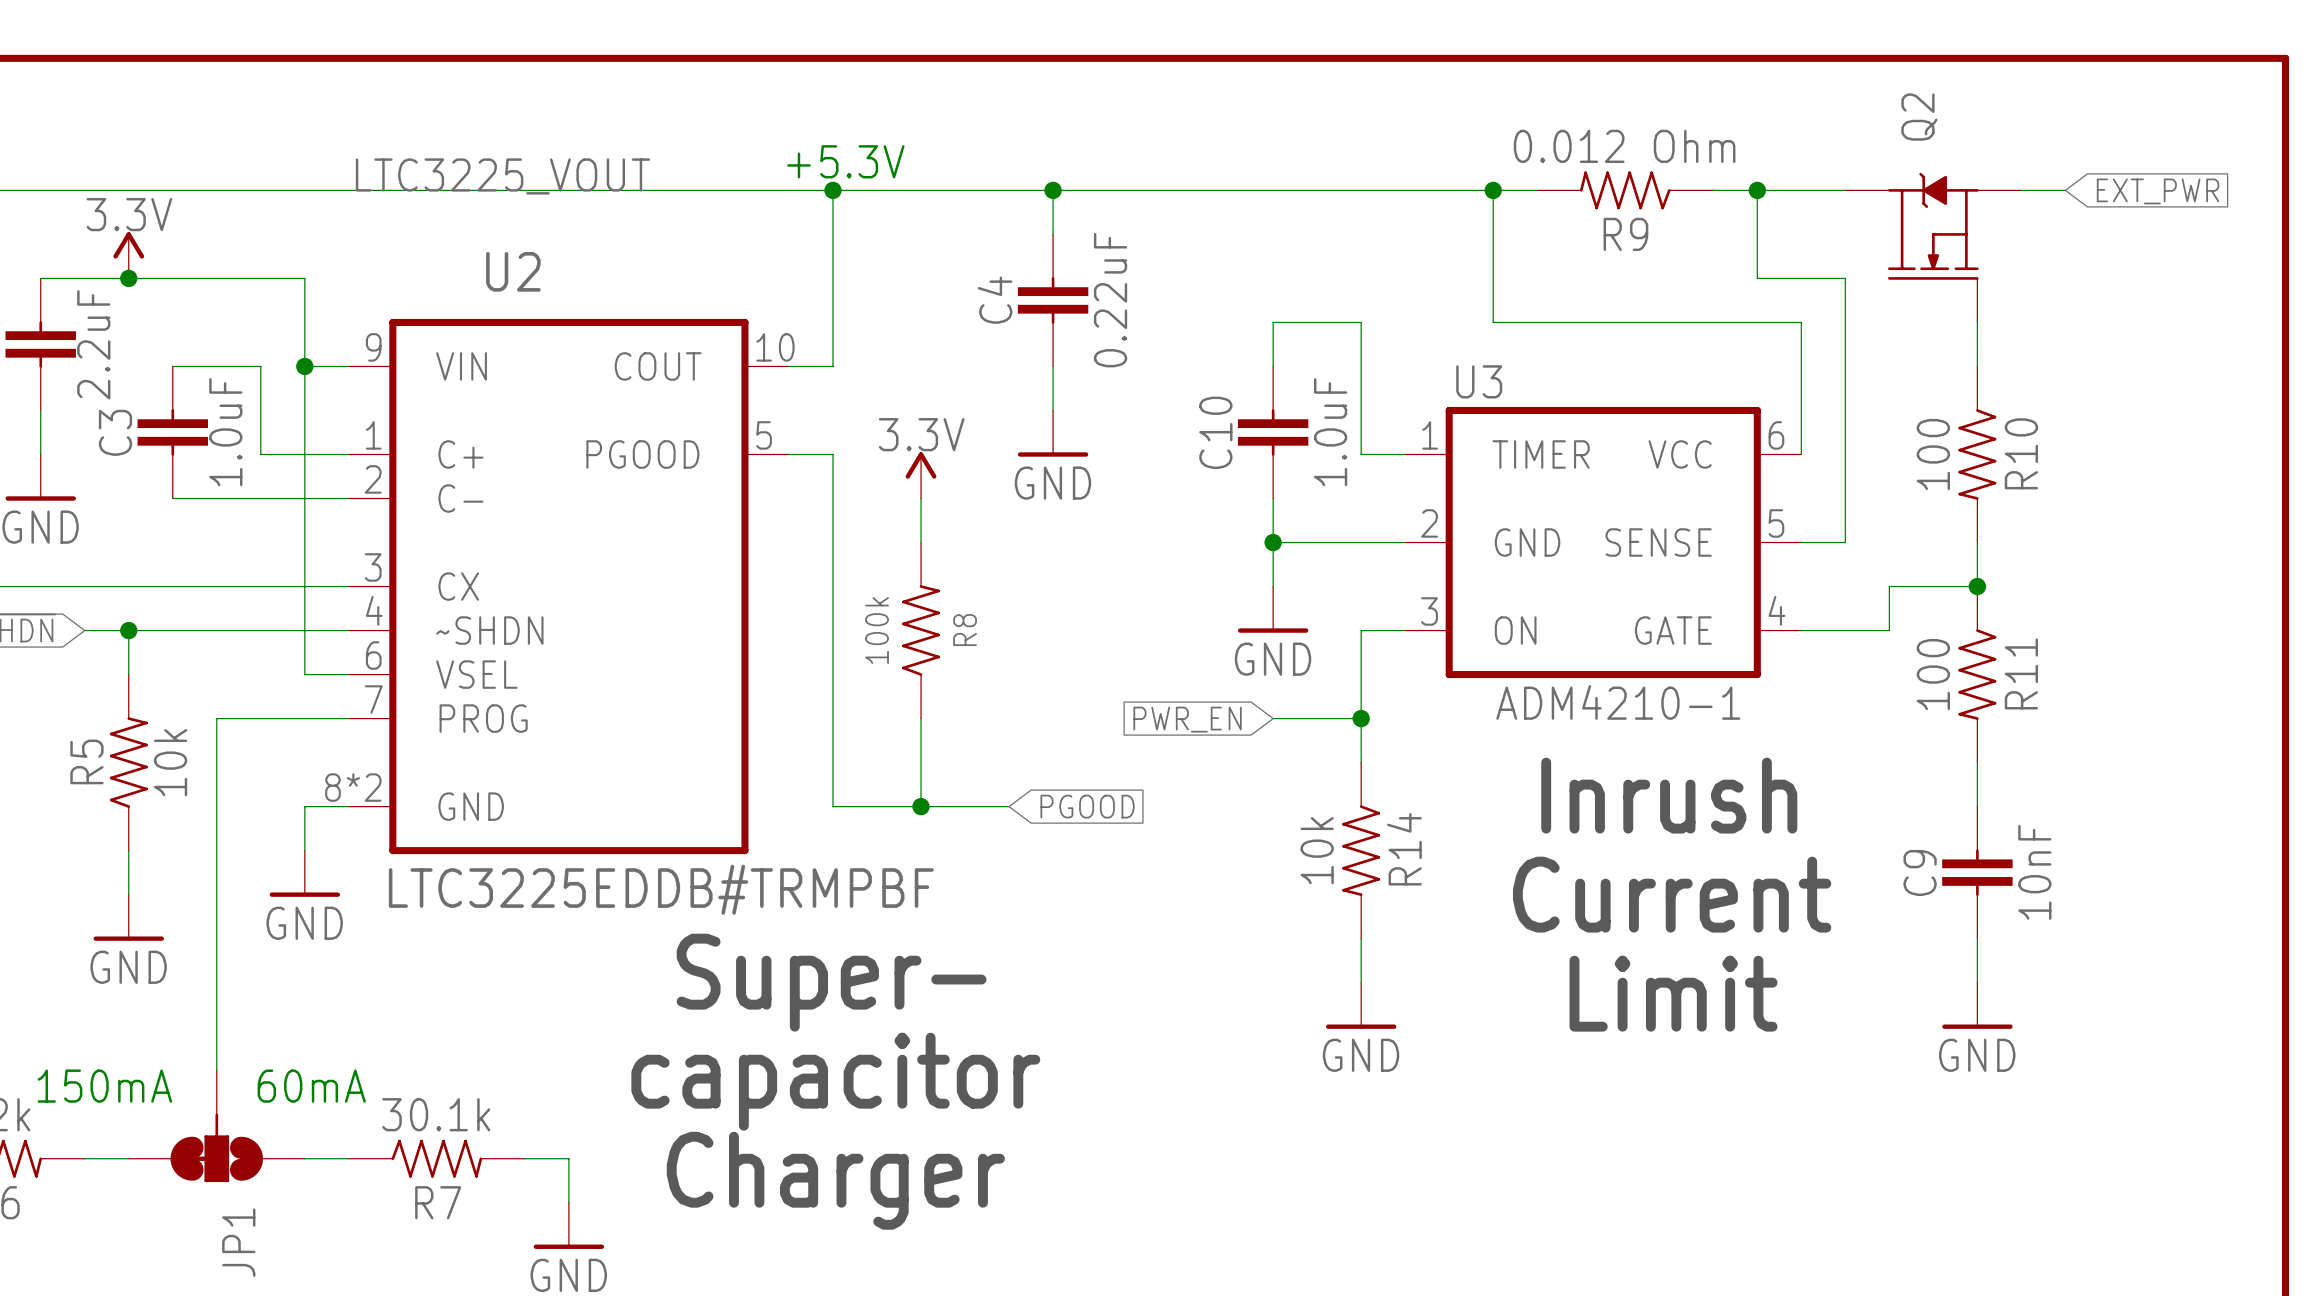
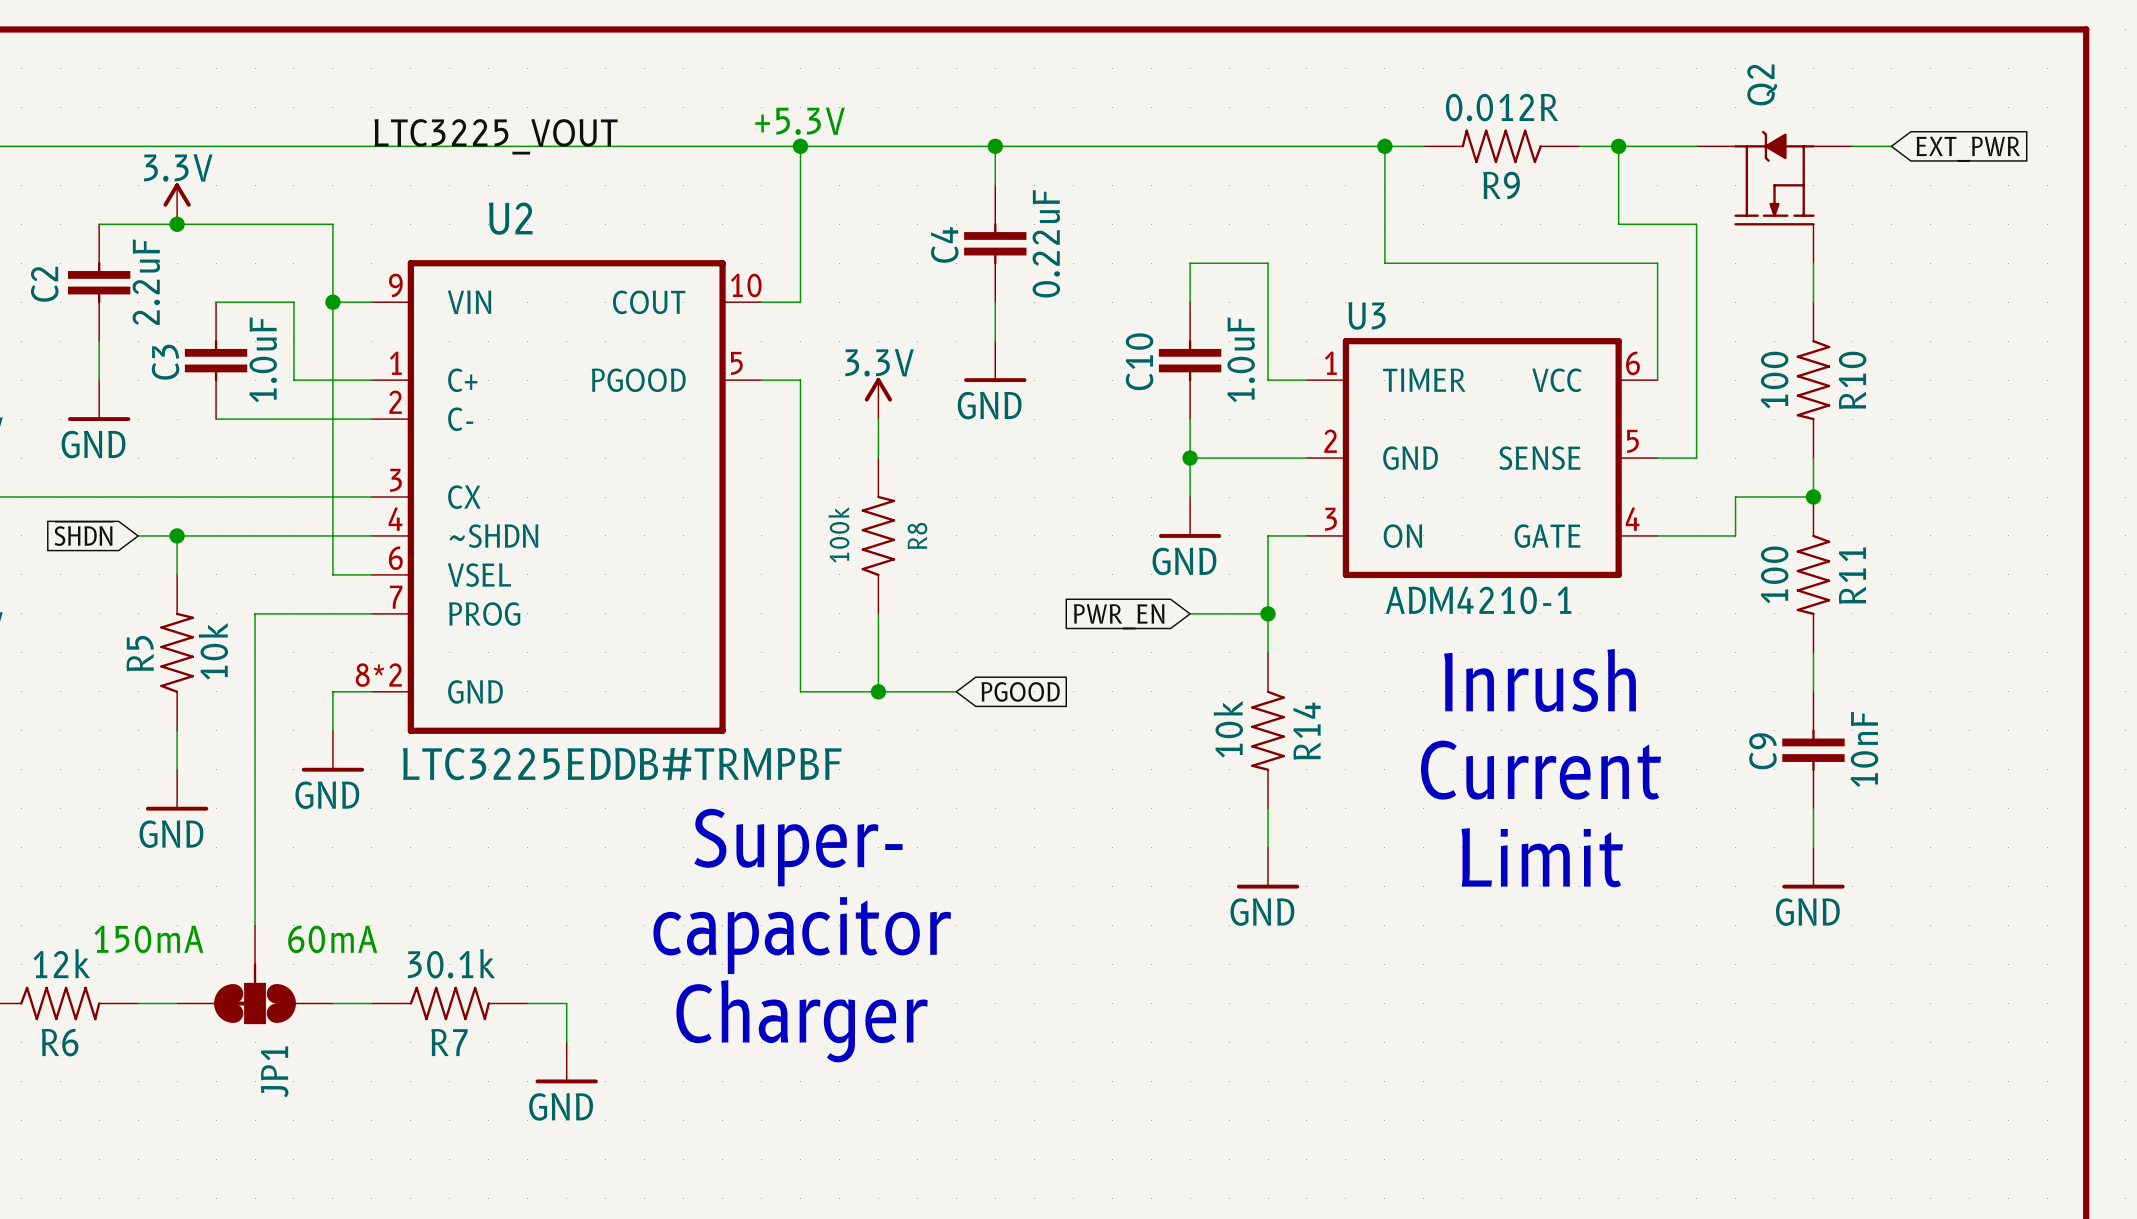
R9 value: 0.012 Ohm (1624, 146) -> 0.012R (1501, 107)

